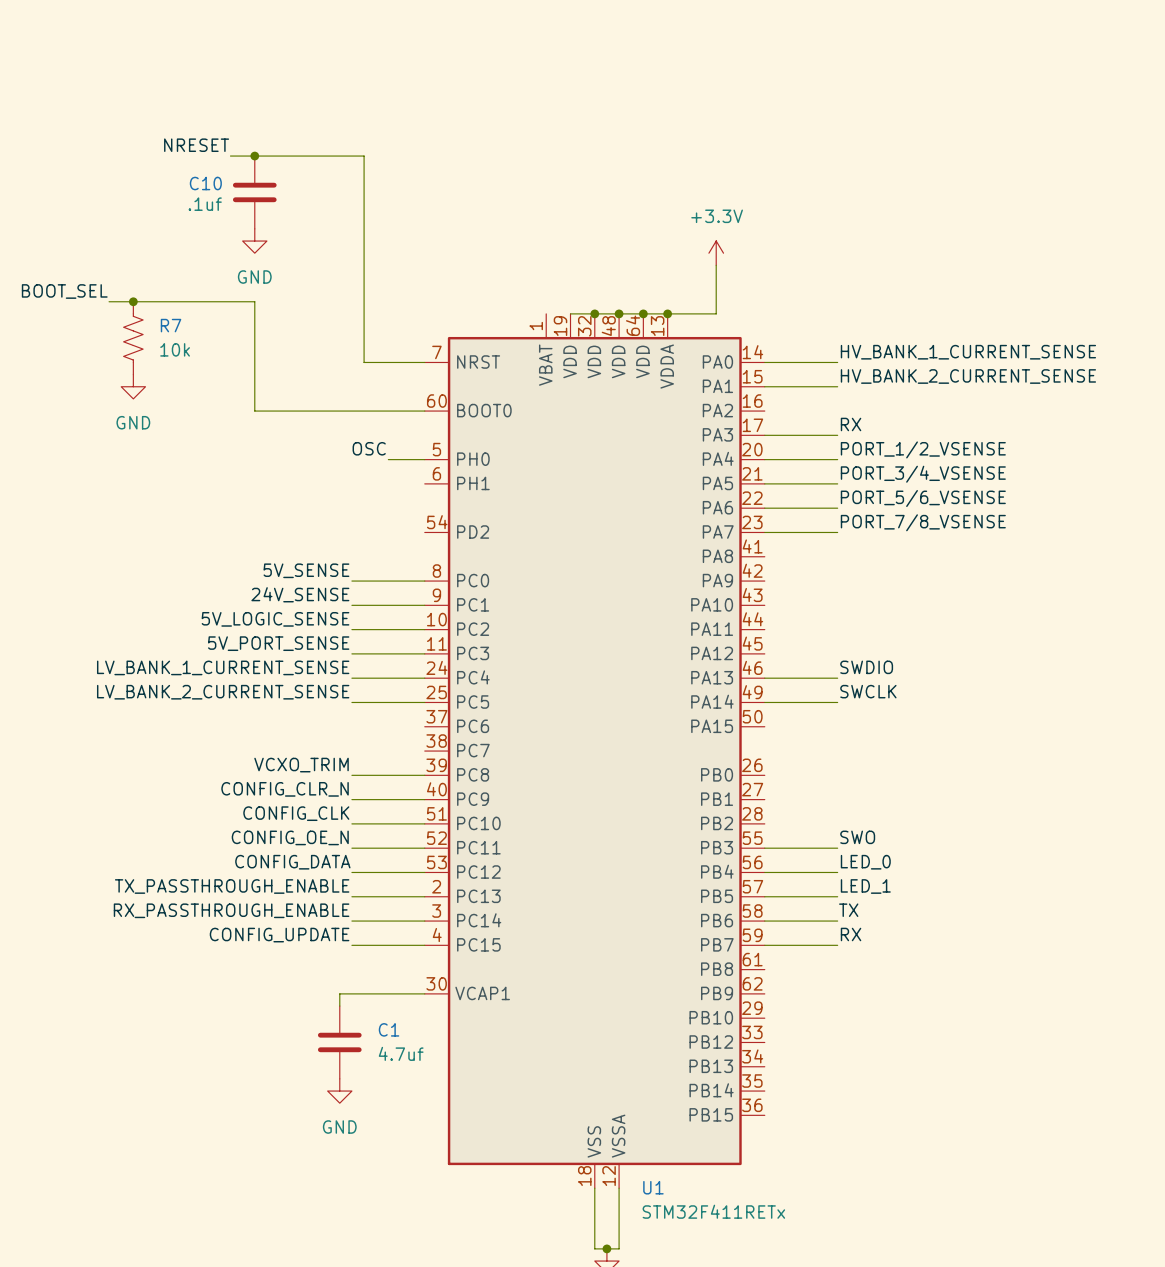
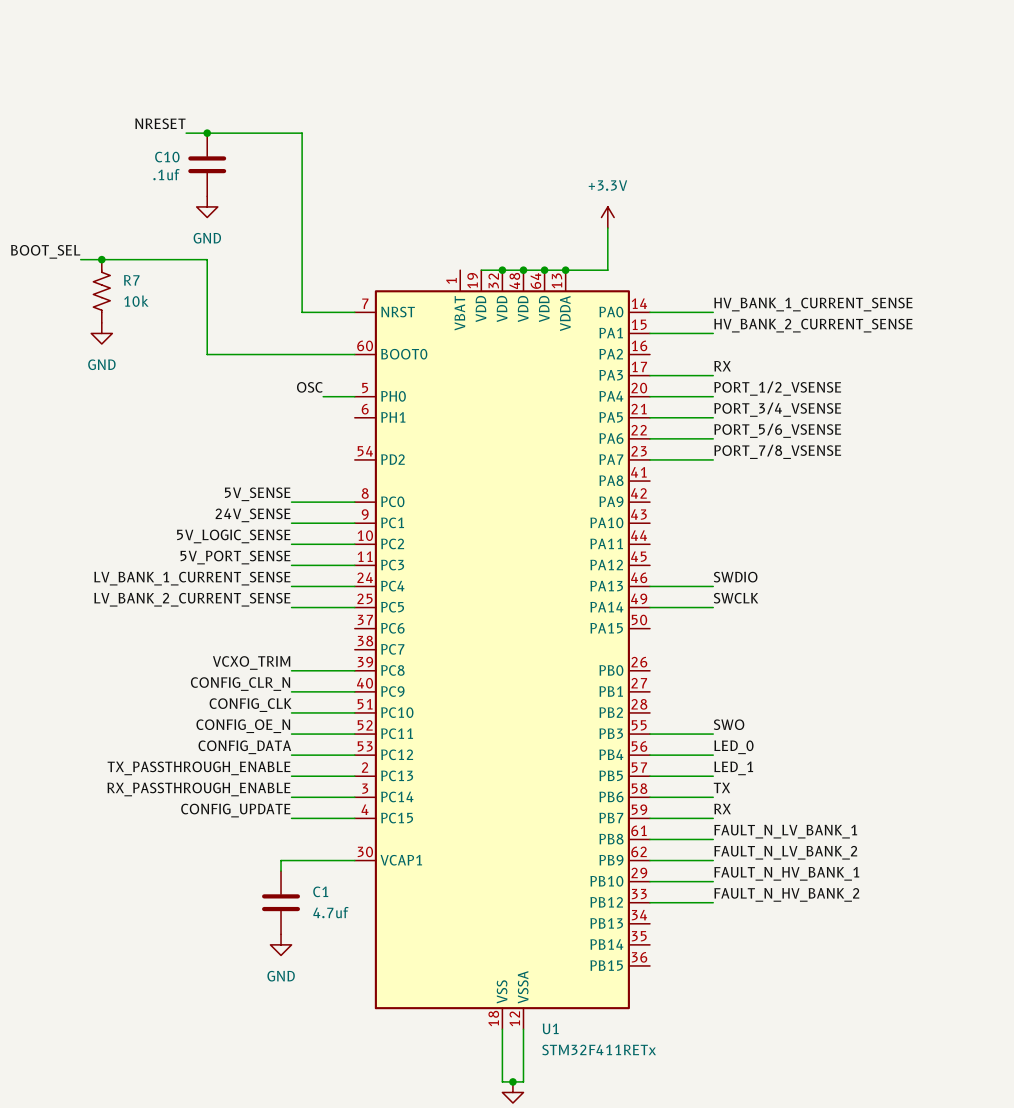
label: none -> FAULT_N_LV_BANK_1 (785, 831)
wire: none -> (649, 839) (713, 839)
label: none -> FAULT_N_LV_BANK_2 (785, 852)
wire: none -> (649, 860) (713, 860)
label: none -> FAULT_N_HV_BANK_1 (786, 873)
wire: none -> (649, 881) (713, 881)
label: none -> FAULT_N_HV_BANK_2 (786, 894)
wire: none -> (649, 902) (713, 902)

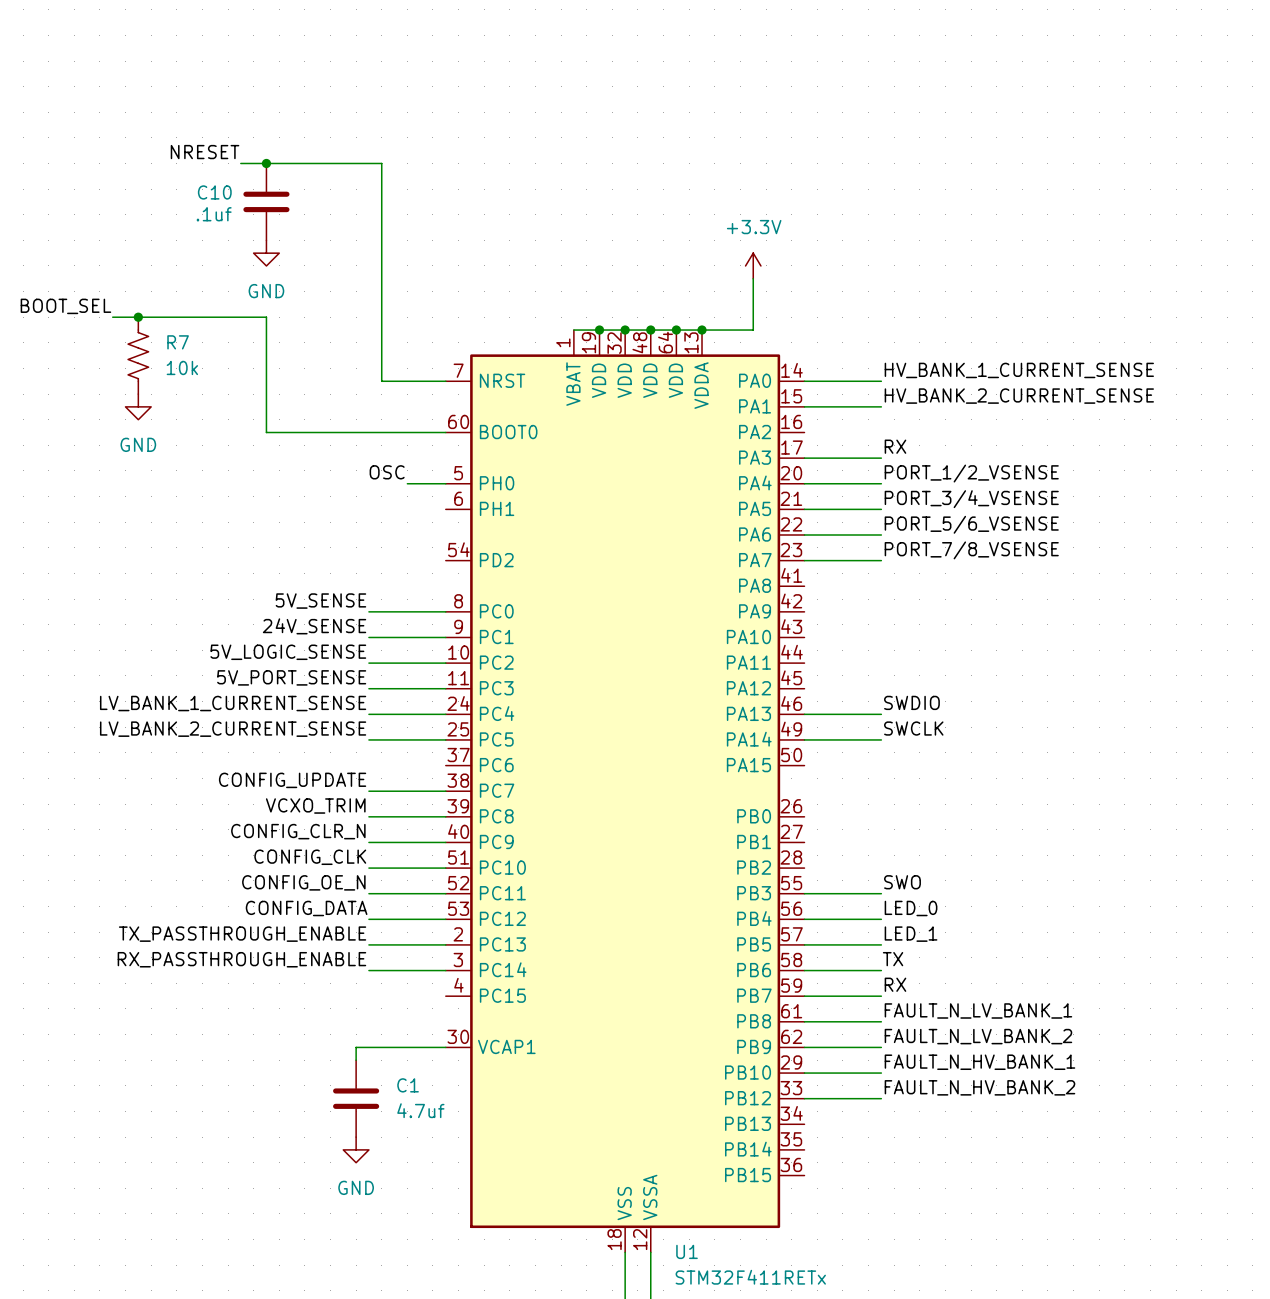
wire: none -> (573, 330) (599, 330)
junction: none -> (599, 330)
label position: CONFIG_UPDATE (235, 810) -> CONFIG_UPDATE (292, 780)
wire: (291, 818) (354, 818) -> (368, 791) (445, 791)

